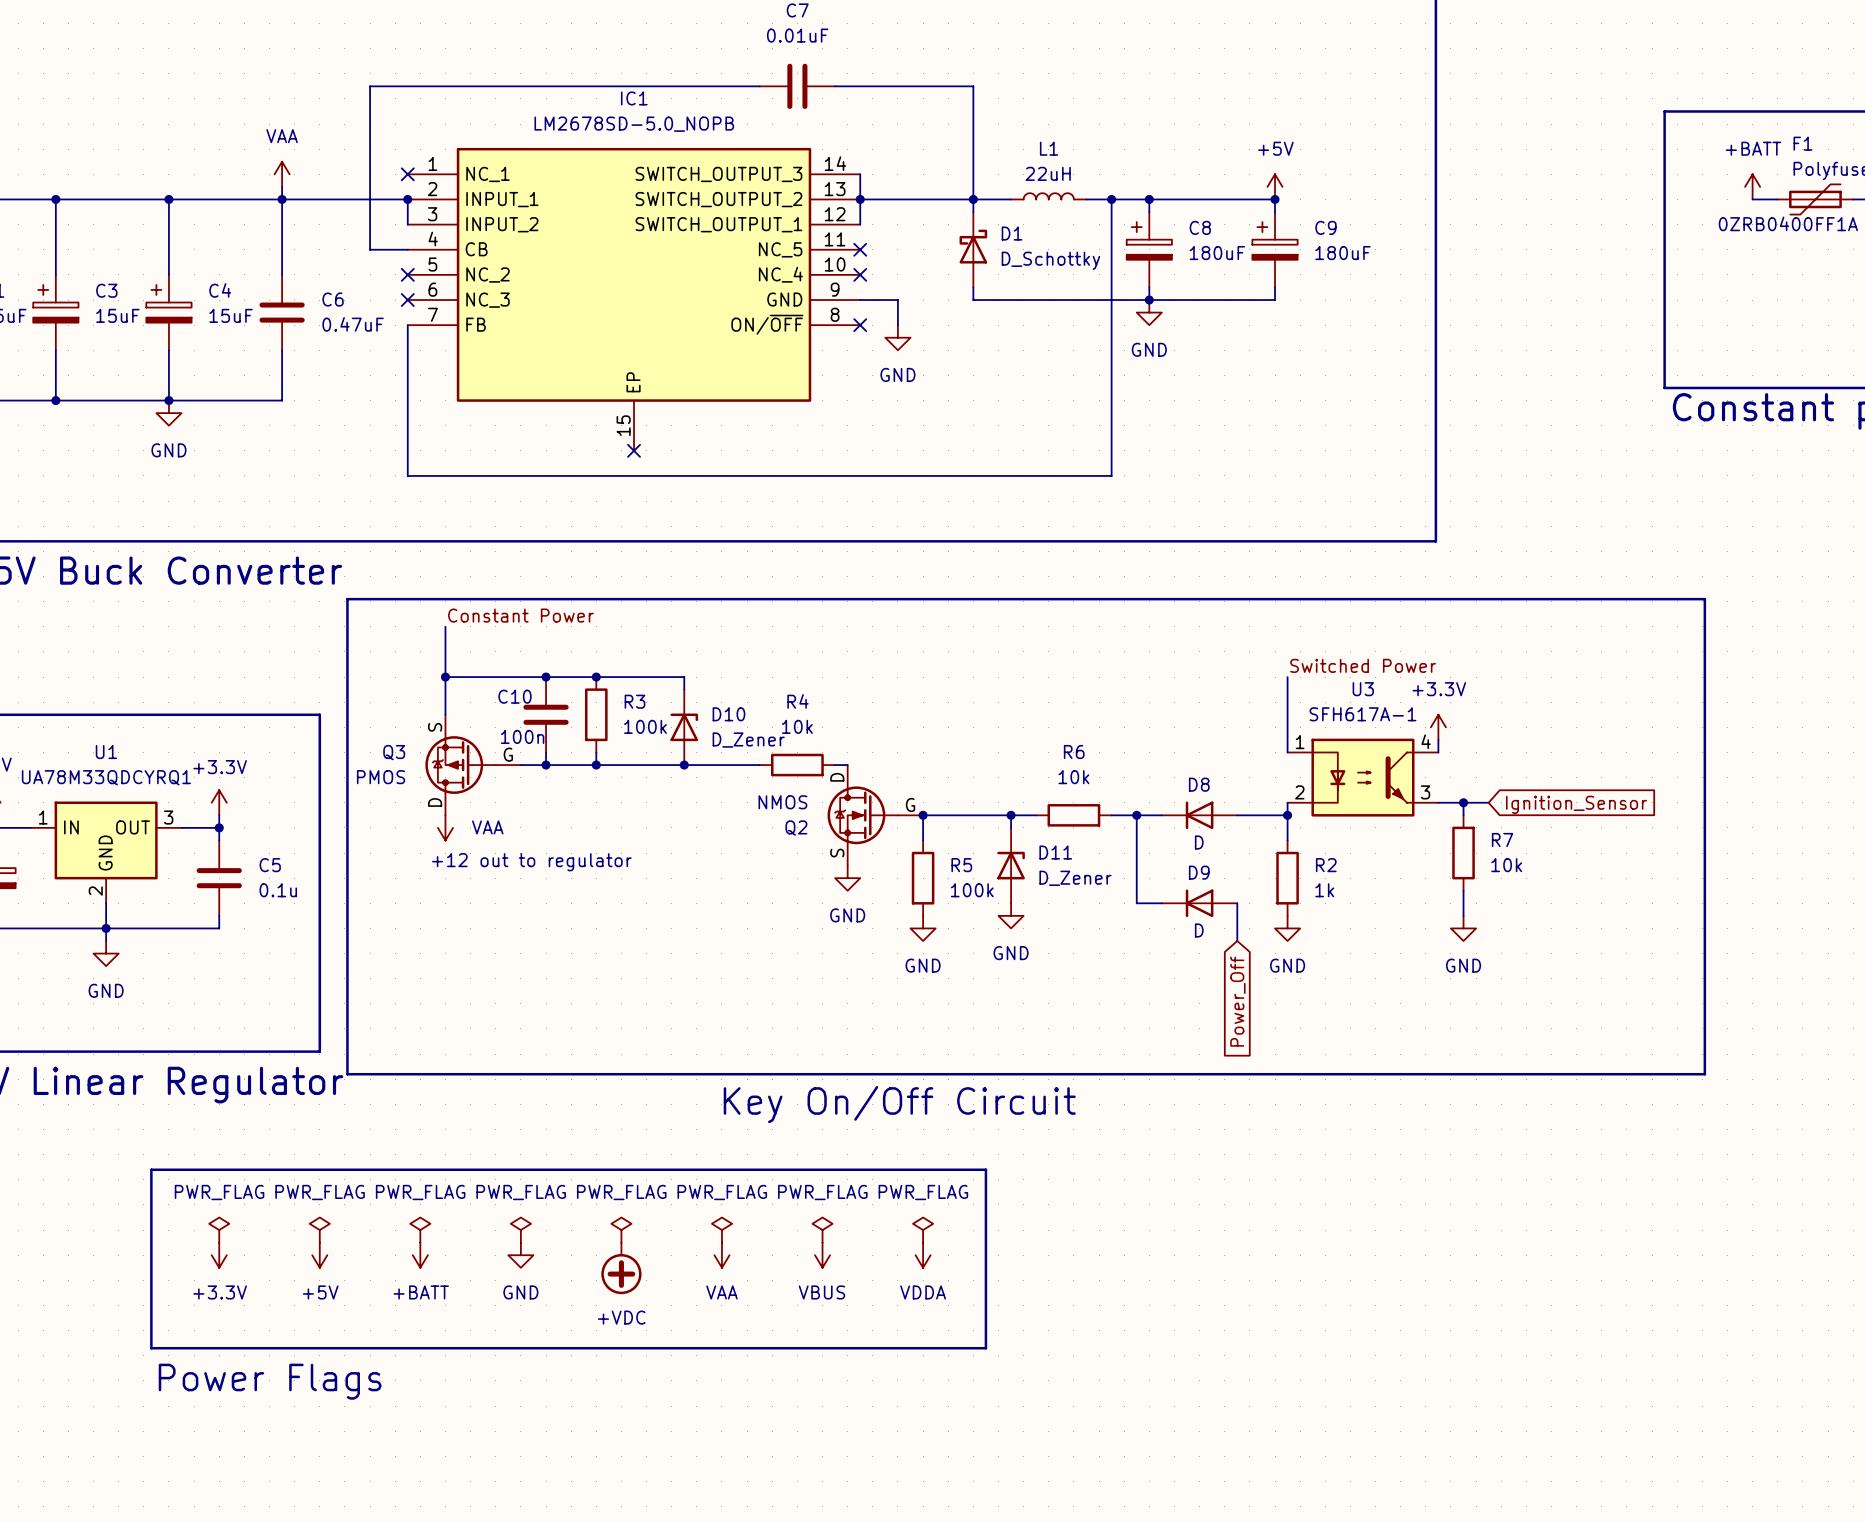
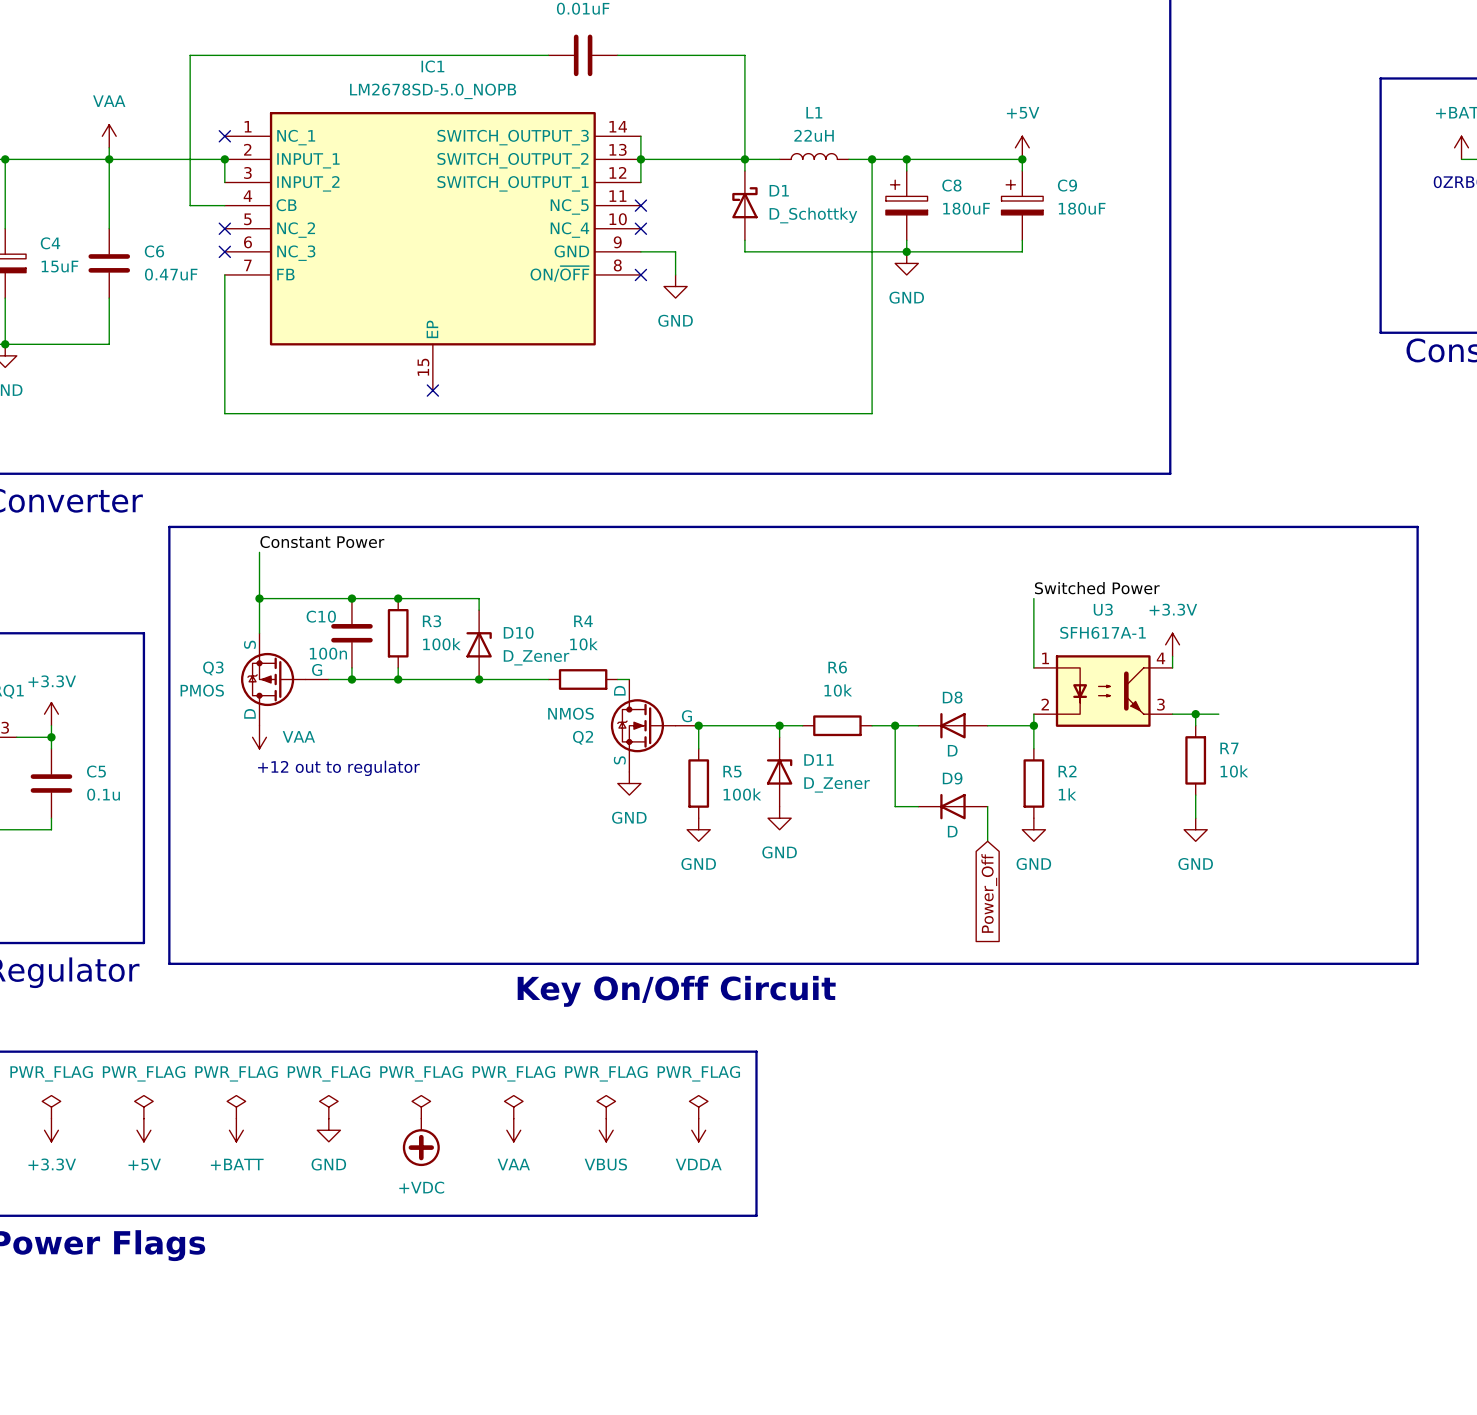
global label: Ignition_Sensor (1576, 804) -> none

